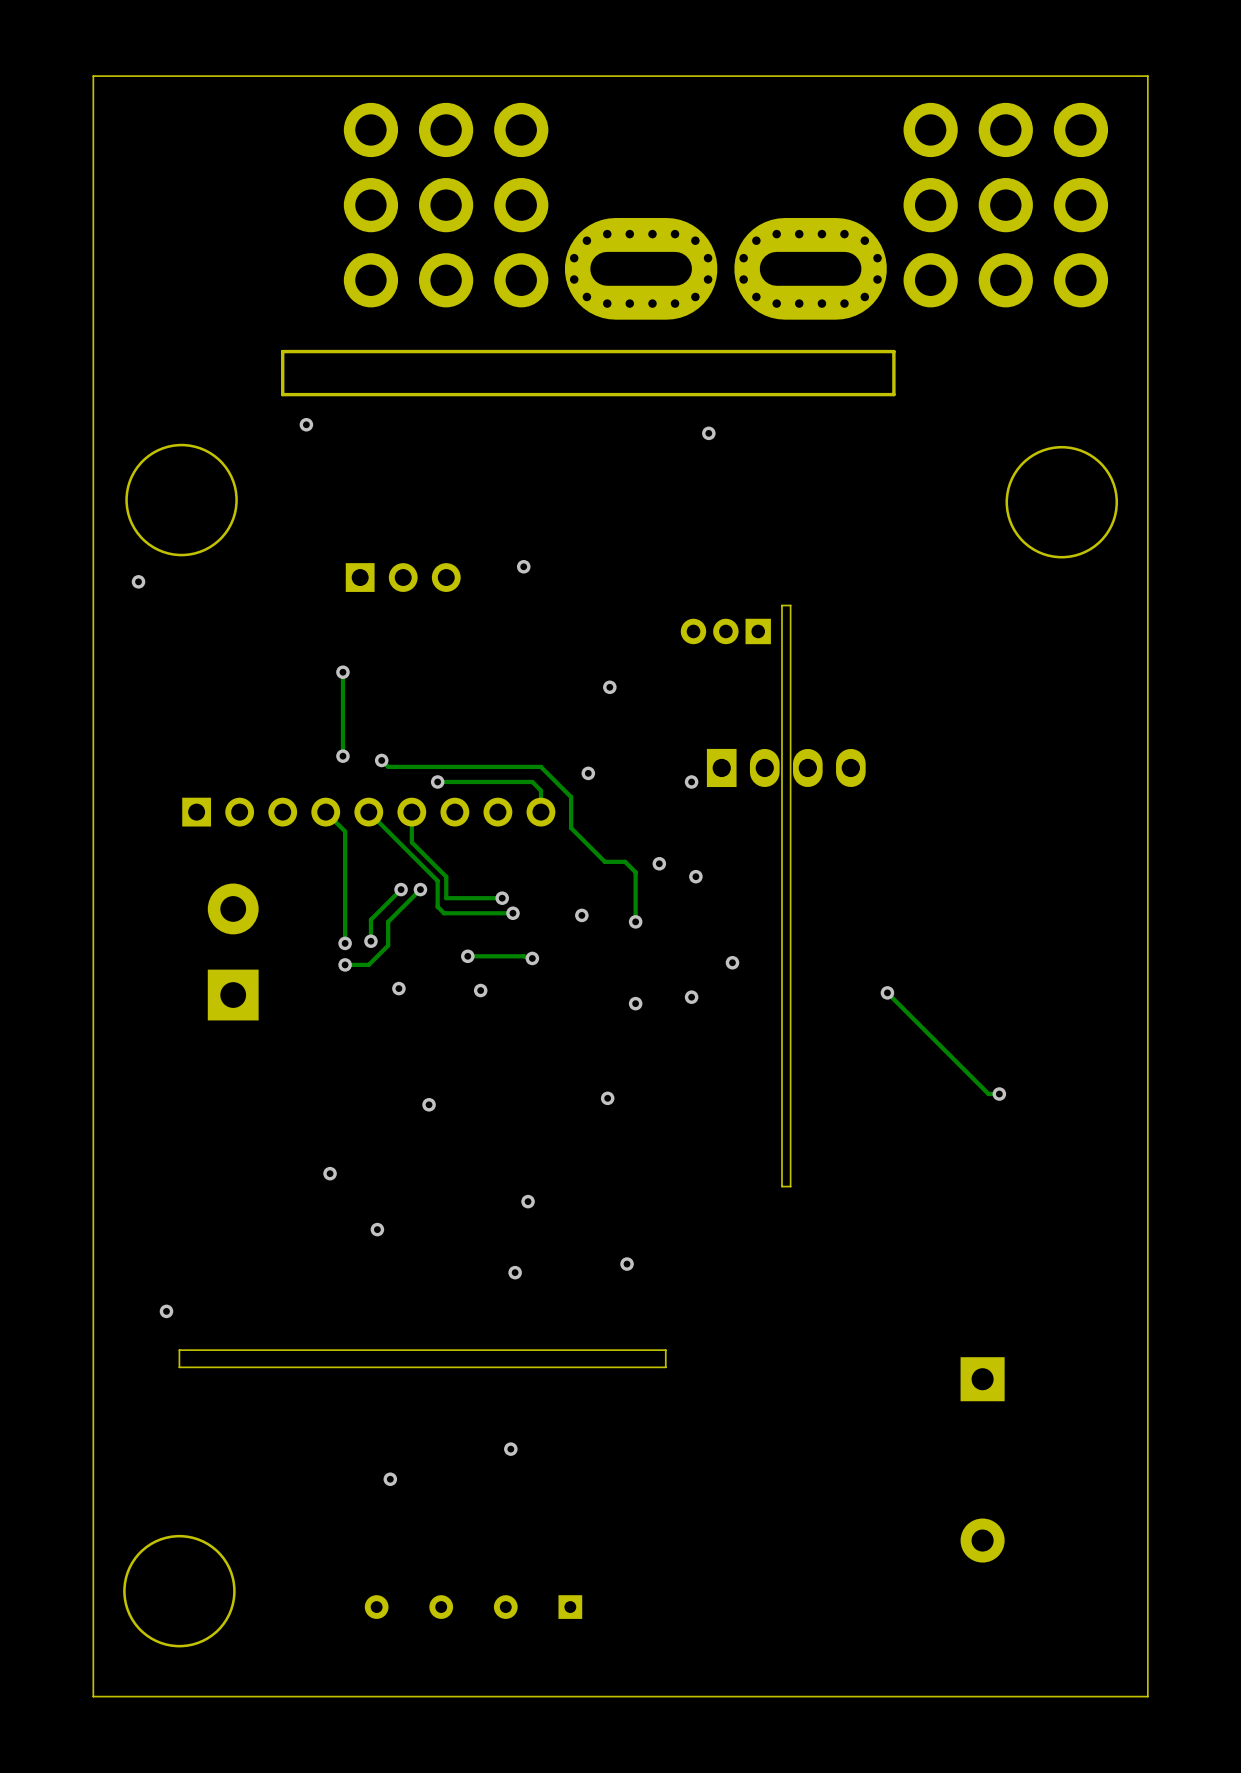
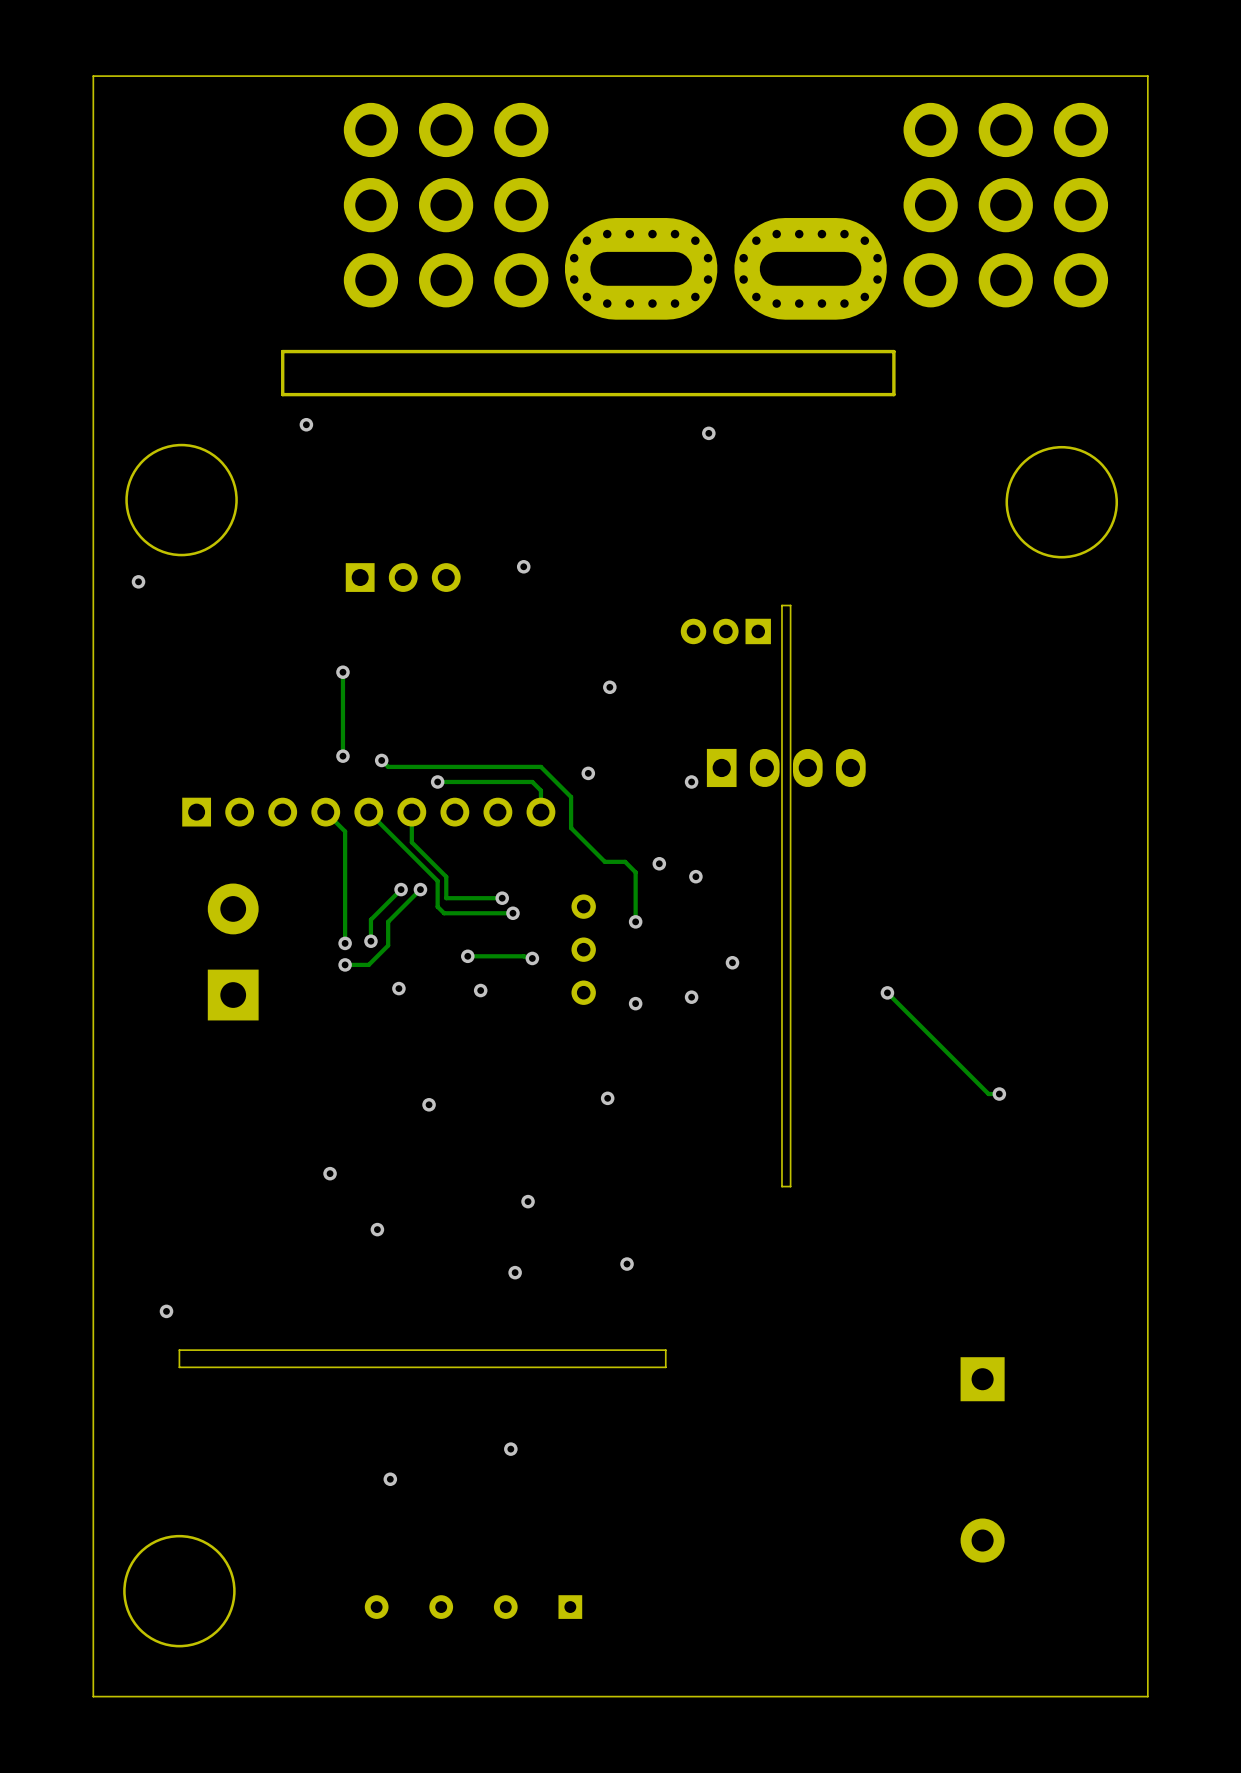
via: (581, 915) -> none
part: none -> (583, 949)

